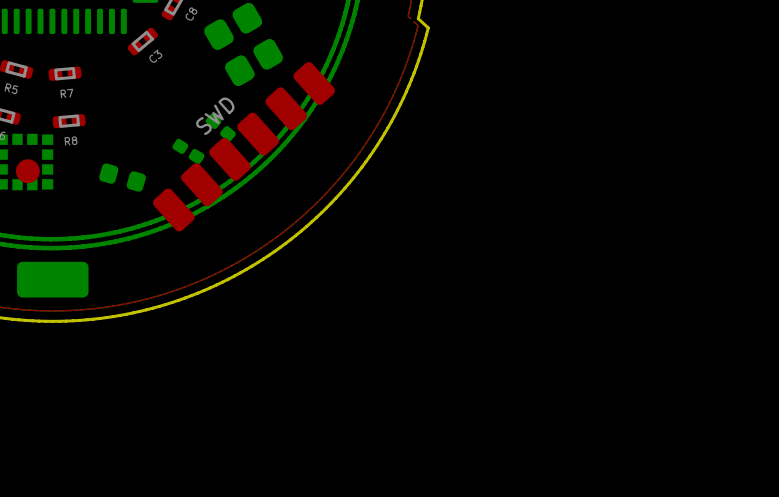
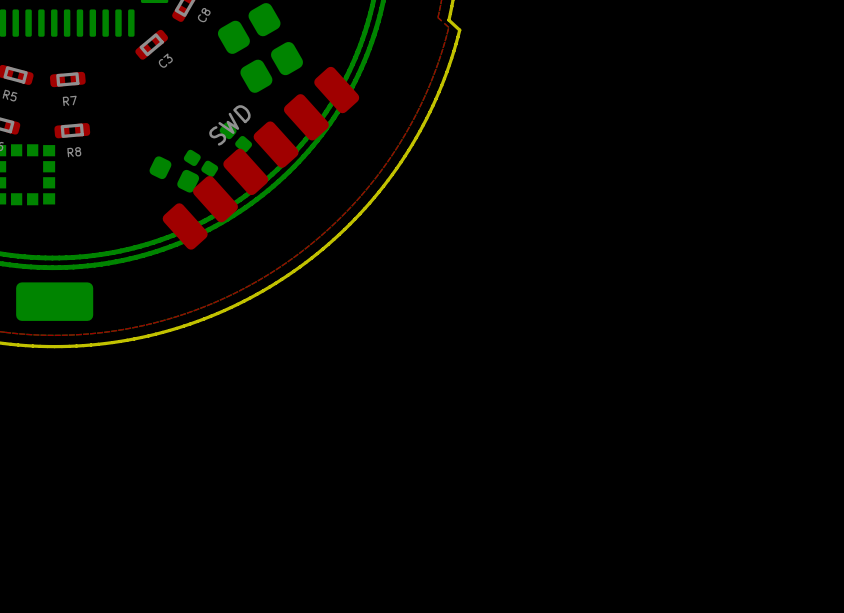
part: none -> (174, 174)
part: (27, 171) -> none
part: (122, 177) -> none

